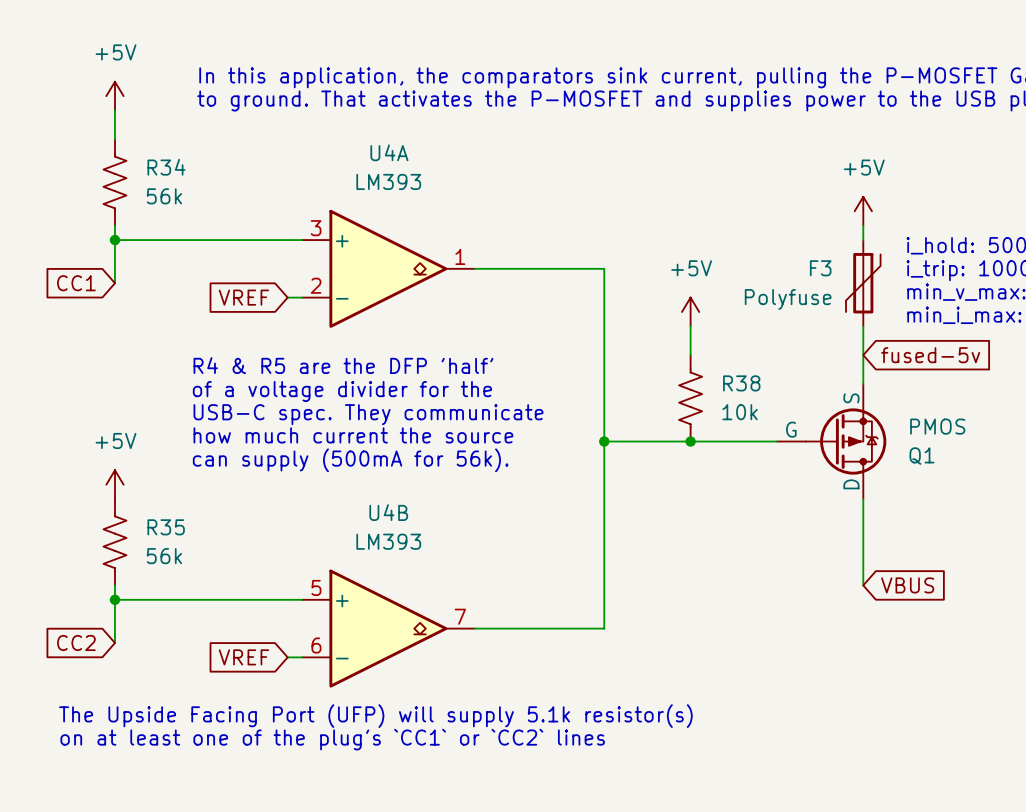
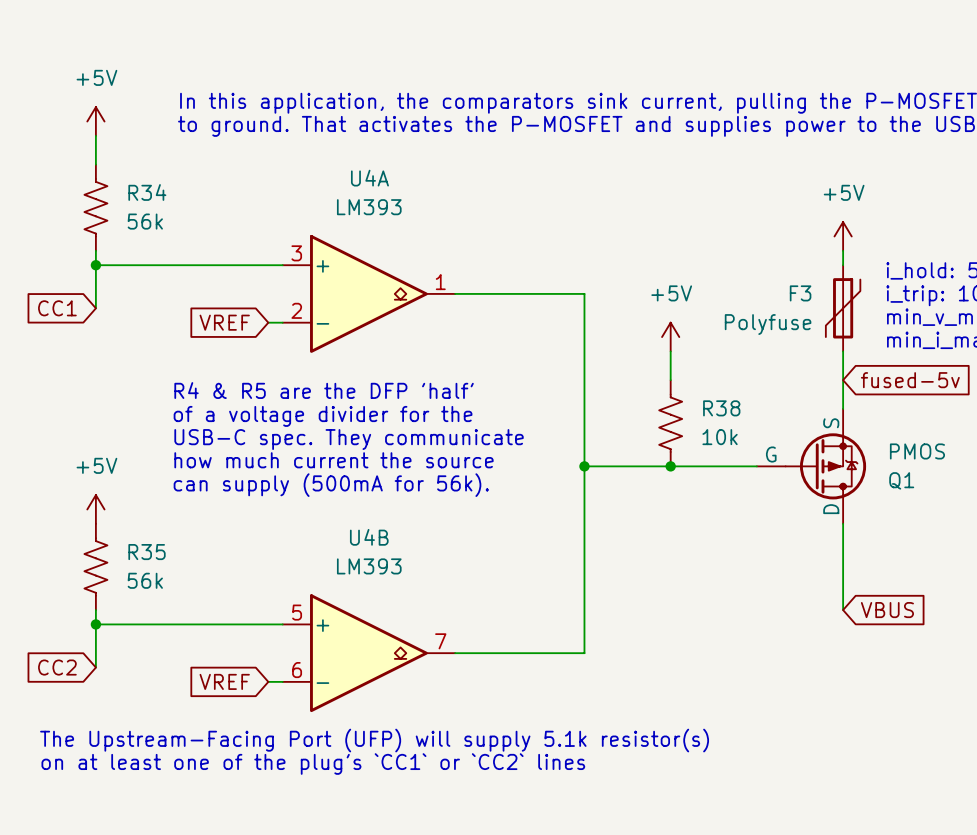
text: The Upside Facing Port (UFP) will supply 5.1k resistor(s) (375, 716) -> The Upstream-Facing Port (UFP) will supply 5.1k resistor(s) (374, 740)

